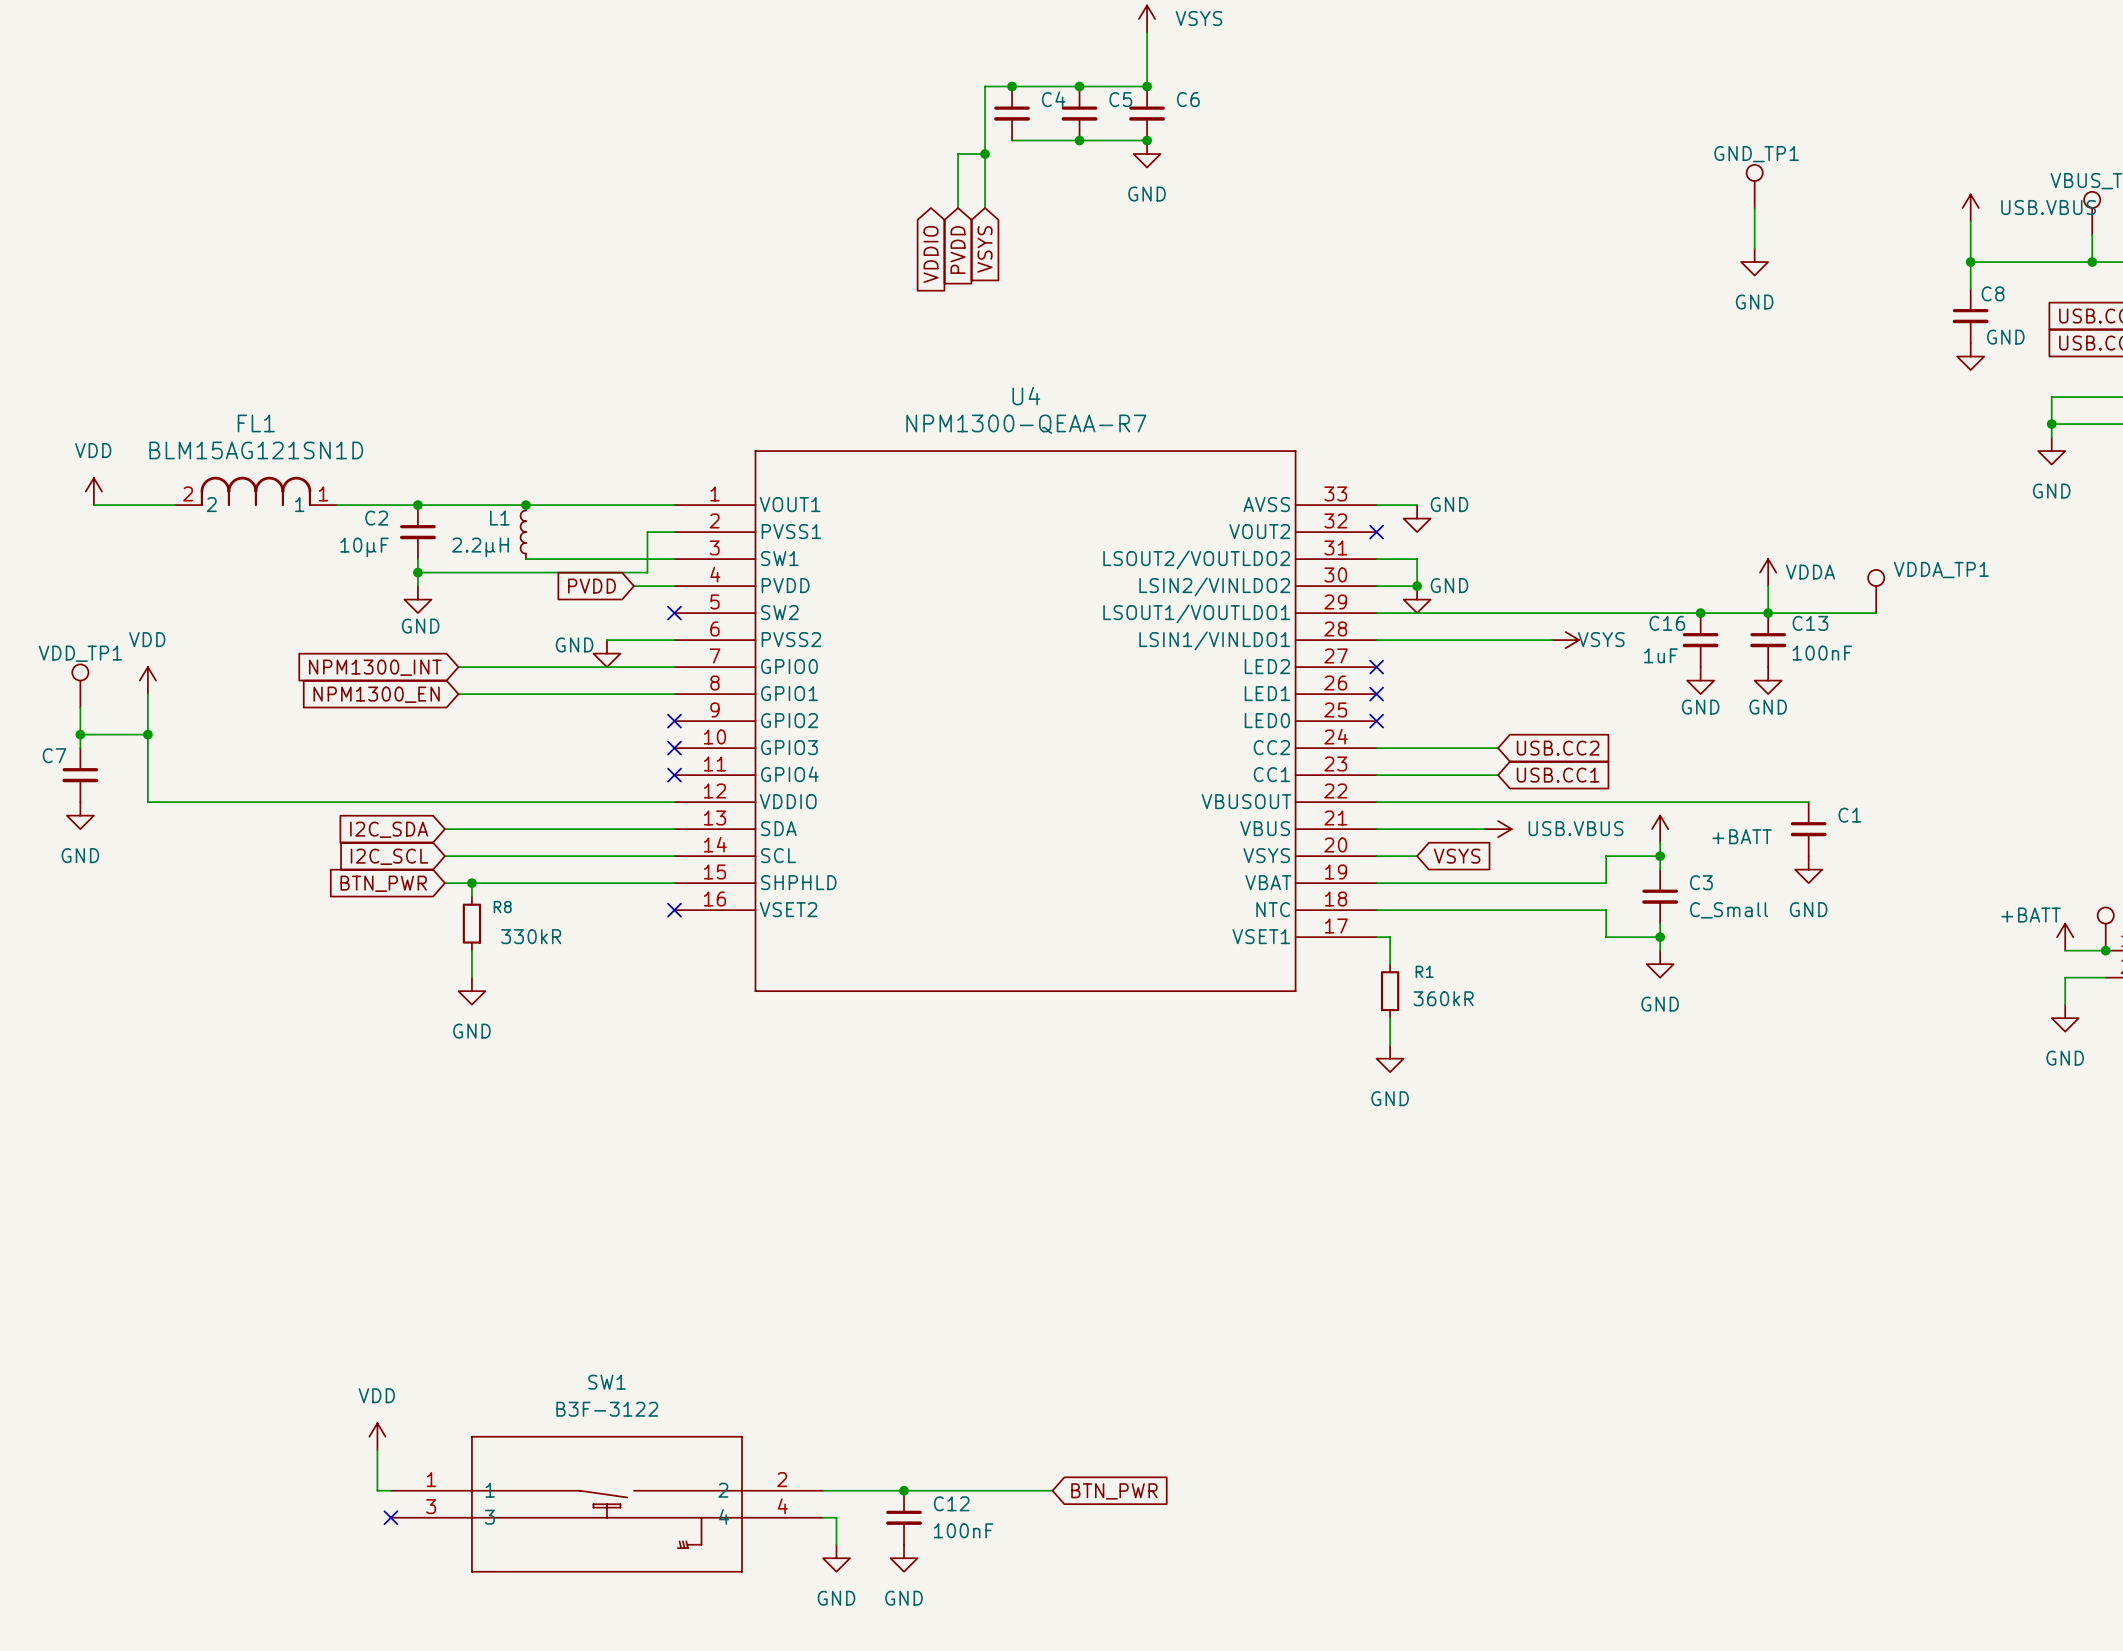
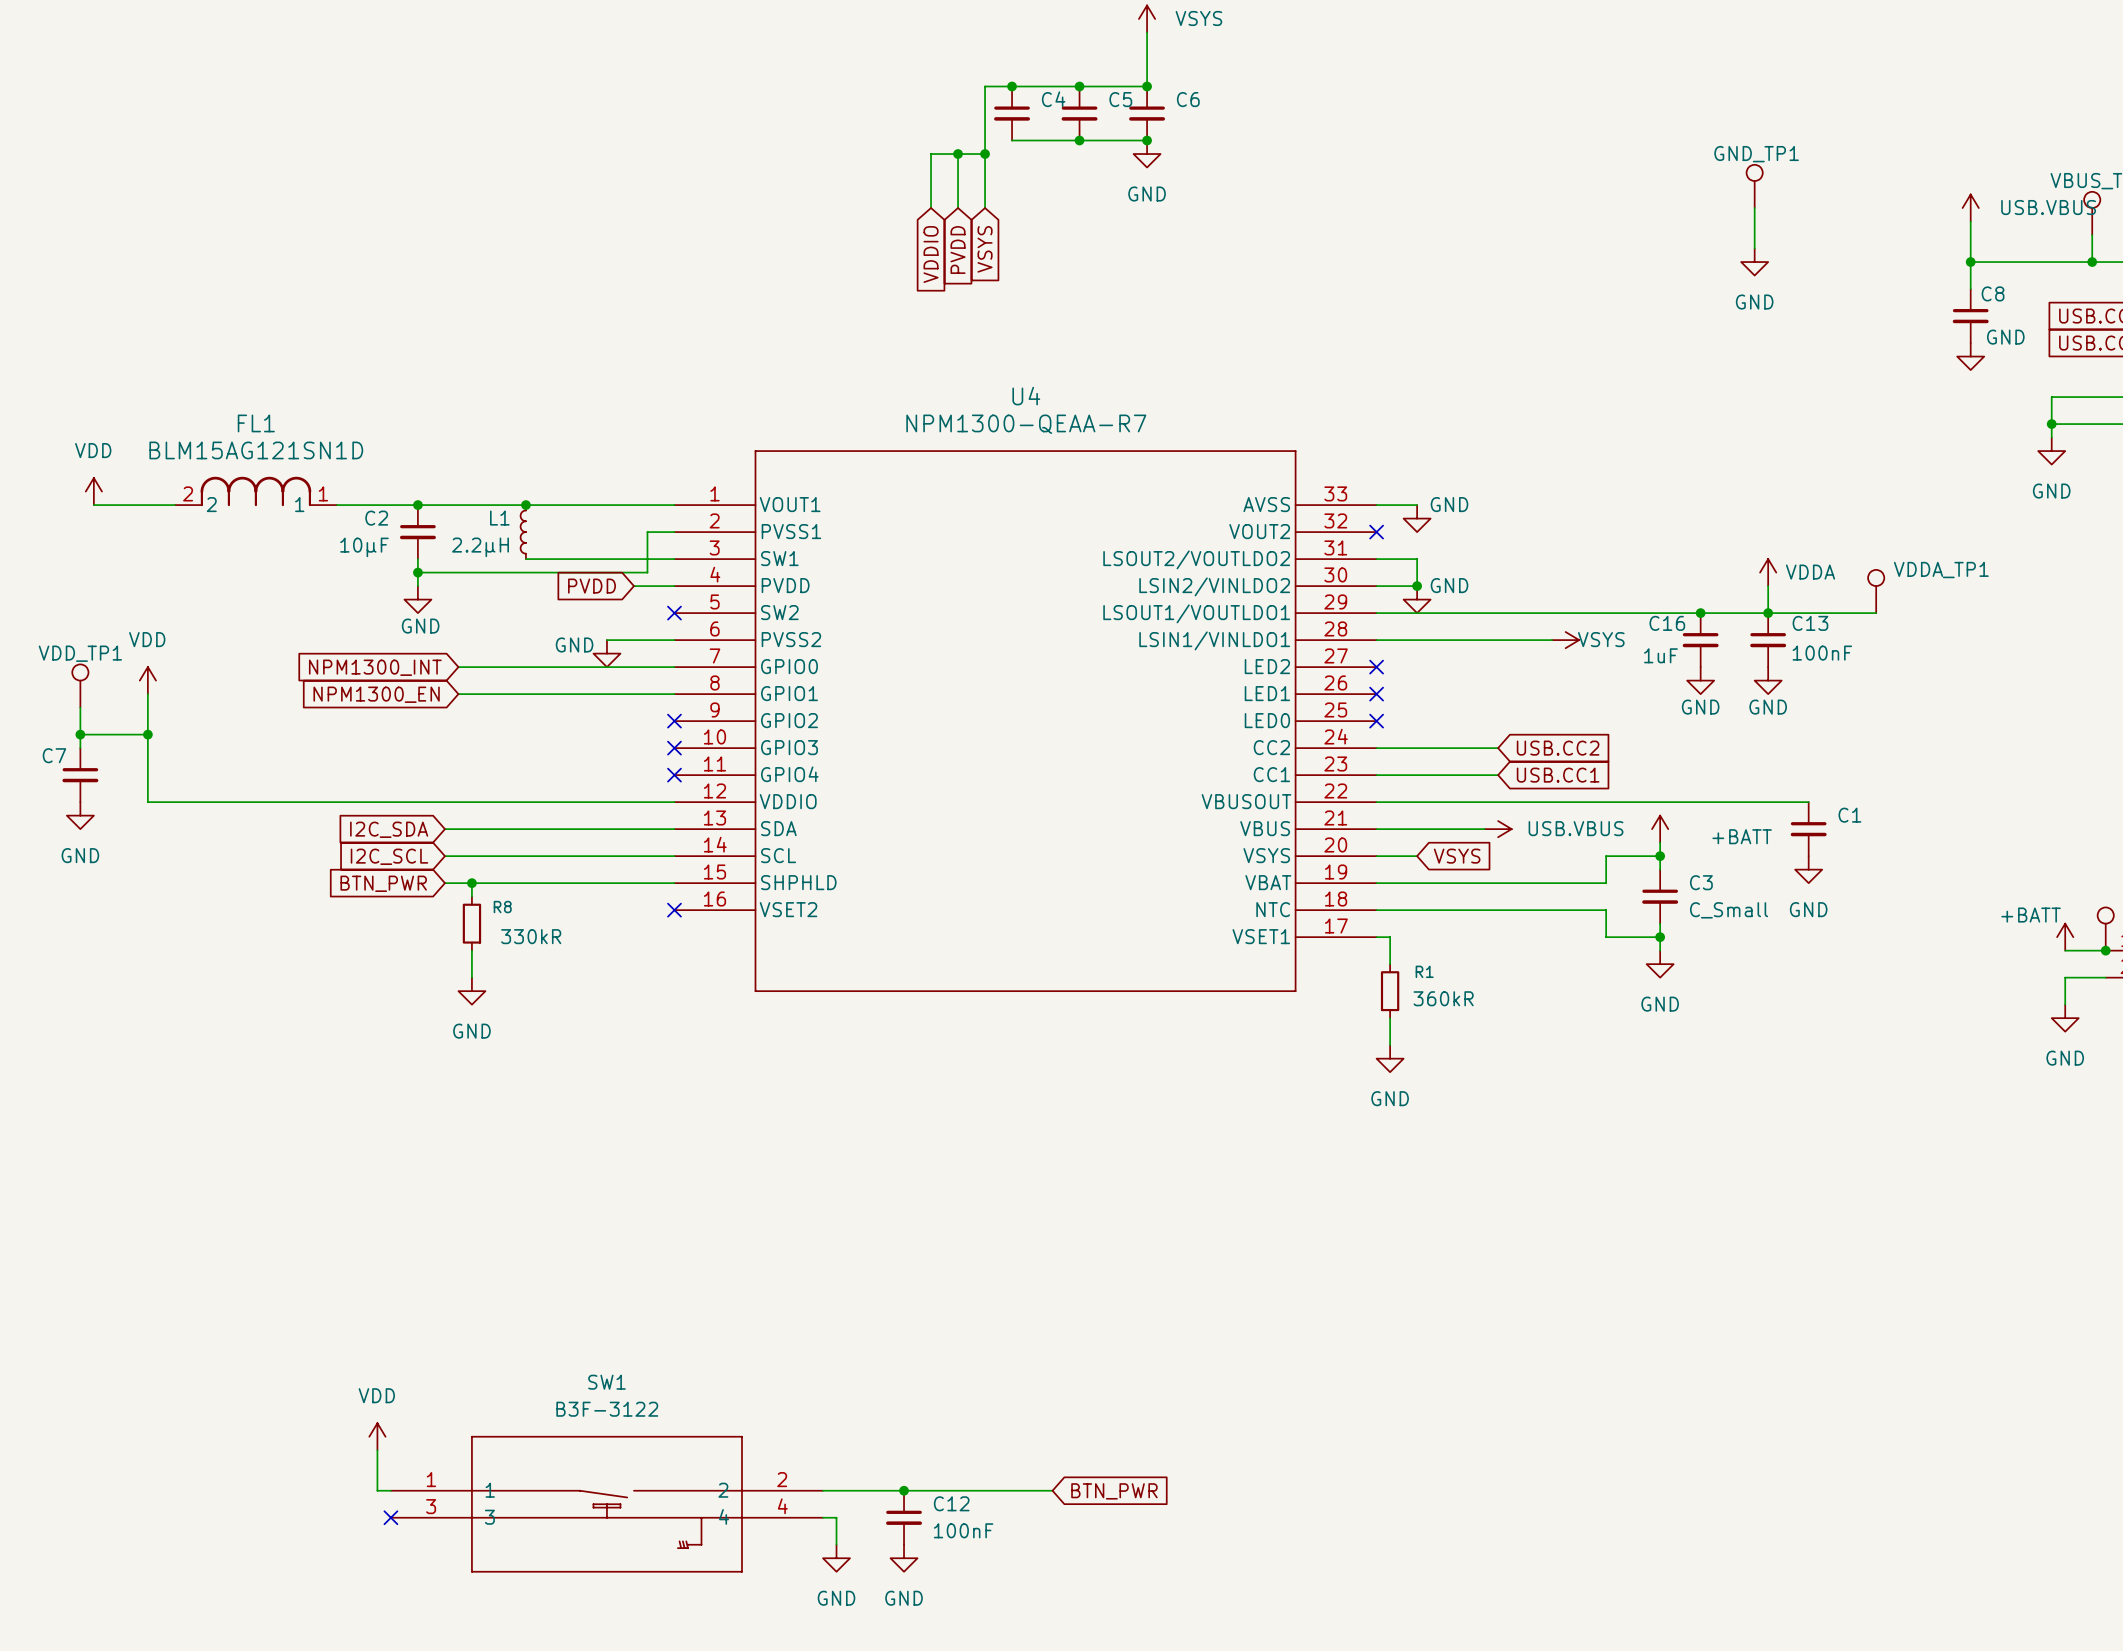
wire: none -> (958, 154) (931, 154) (931, 208)
junction: none -> (958, 154)

